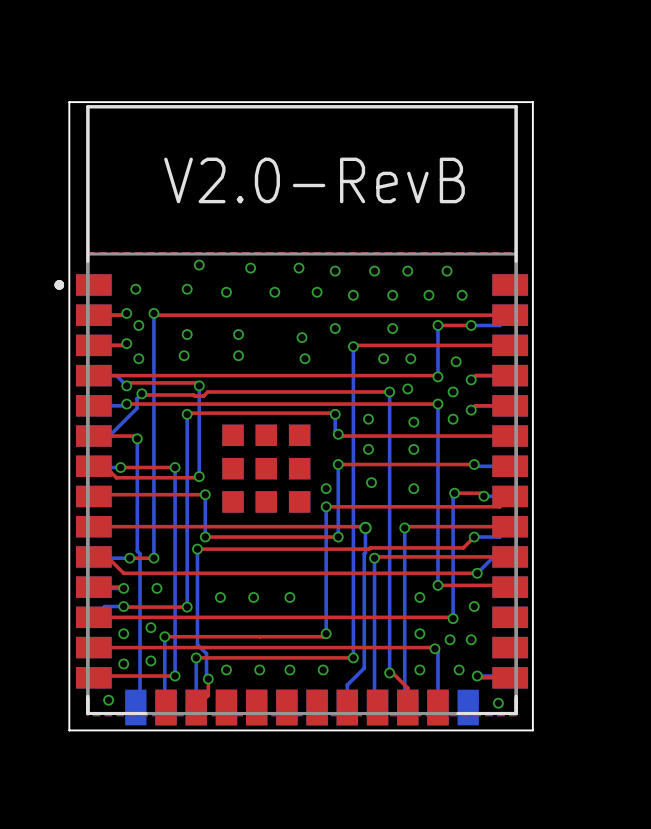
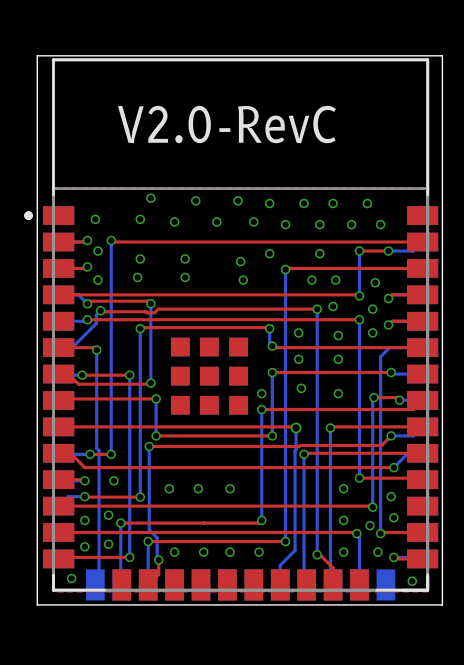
text: V2.0-RevB (314, 180) -> V2.0-RevC (226, 124)
bottom track: none -> (422, 347) (389, 347) (380, 356) (380, 533)
via: none -> (393, 517)
via: (471, 639) -> none
top track: none -> (422, 532) (380, 533)
via: none -> (380, 533)

